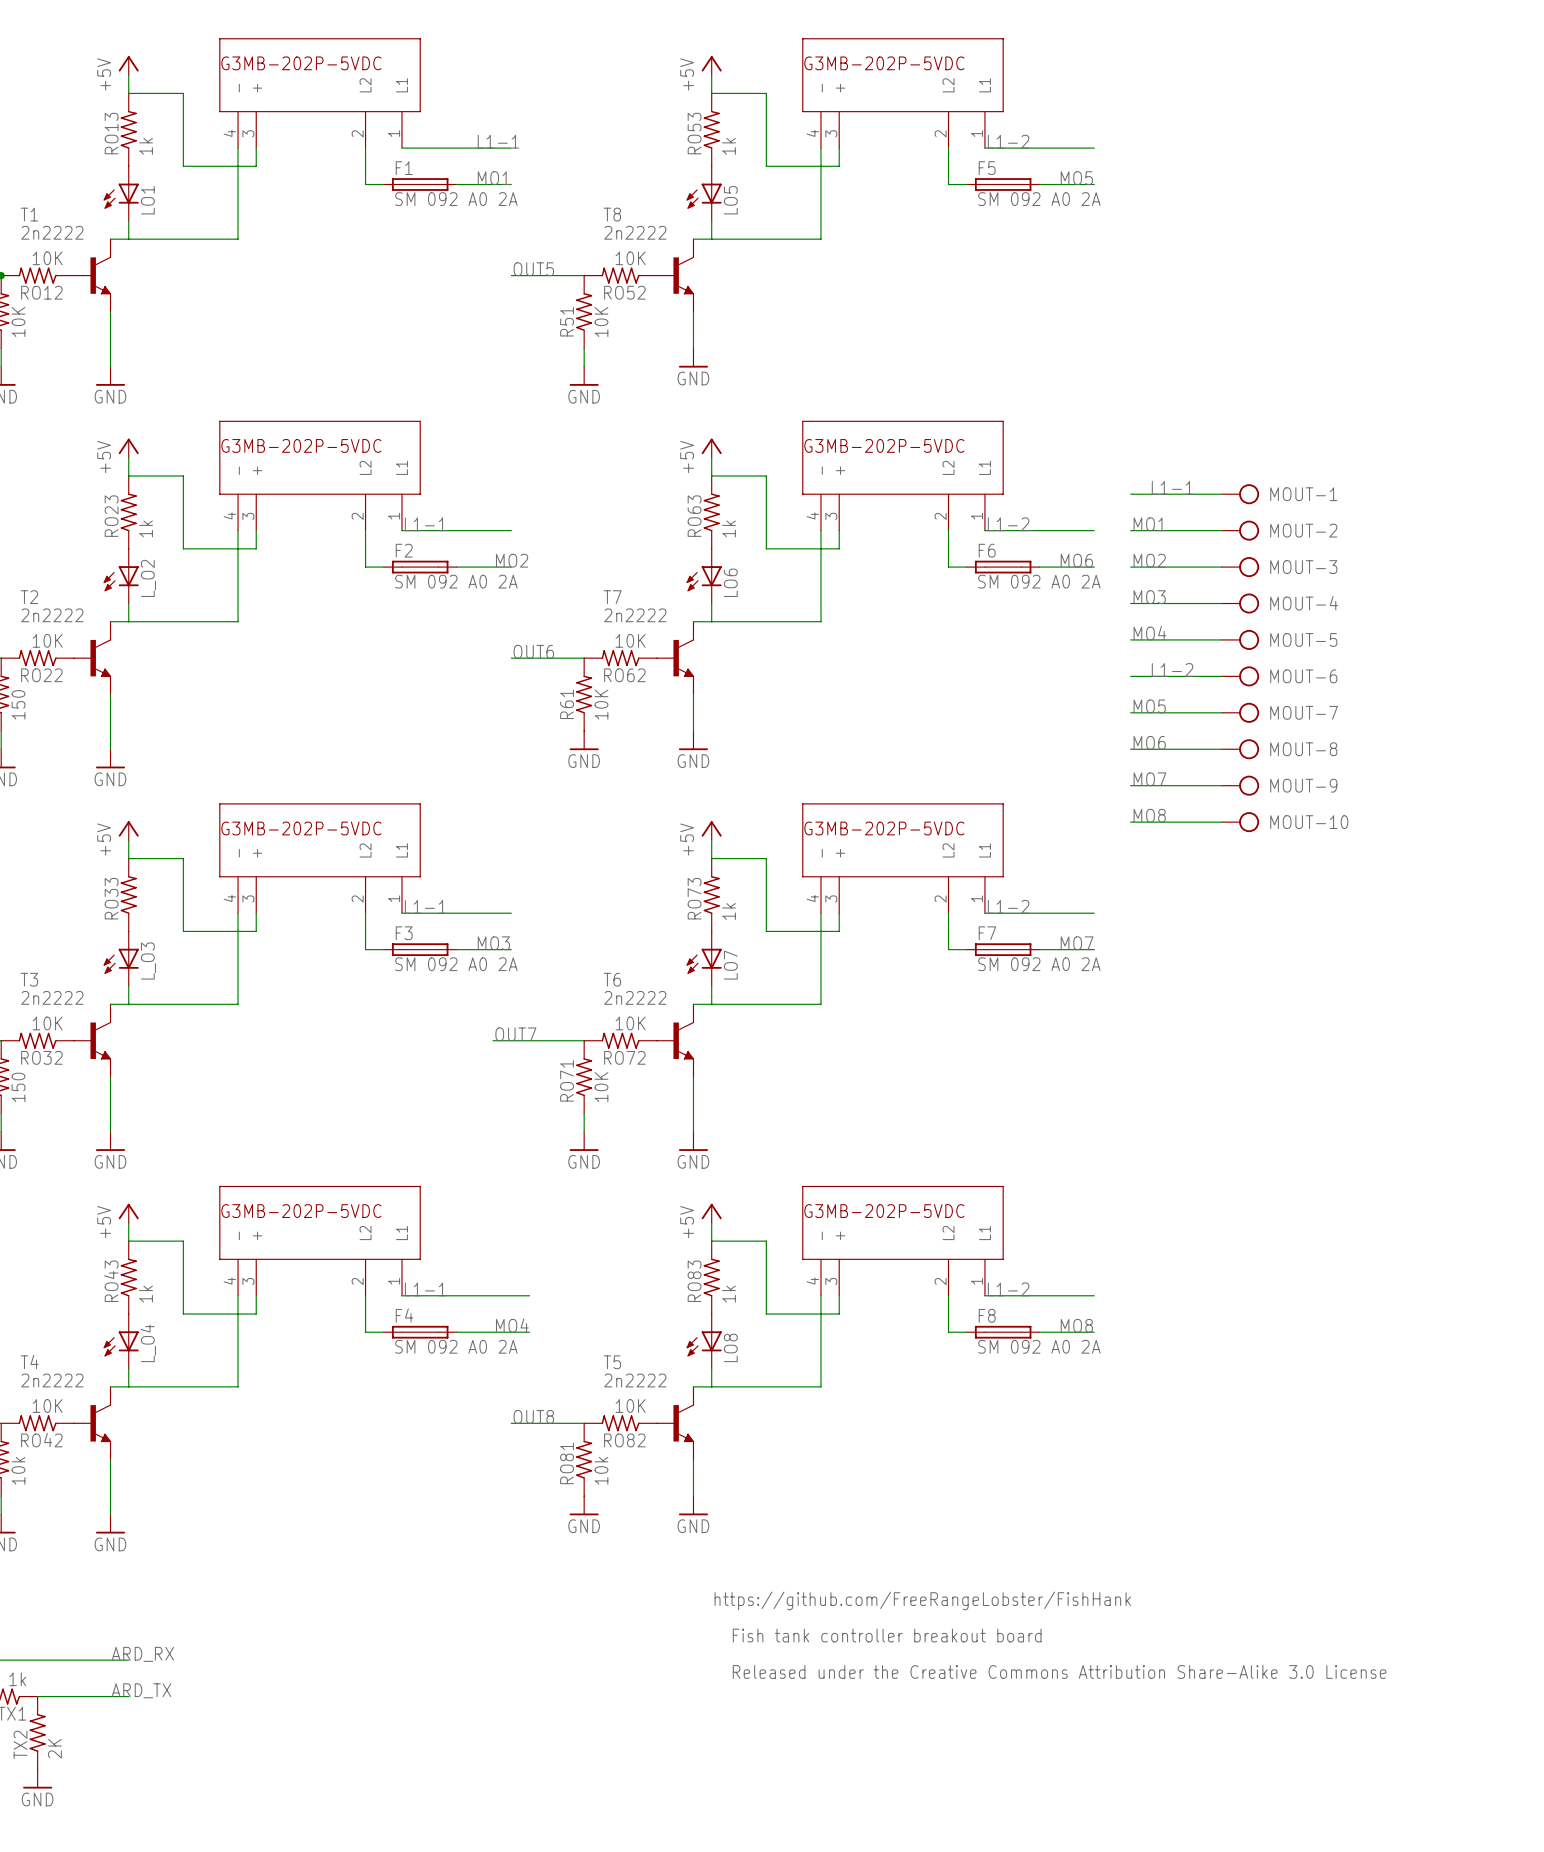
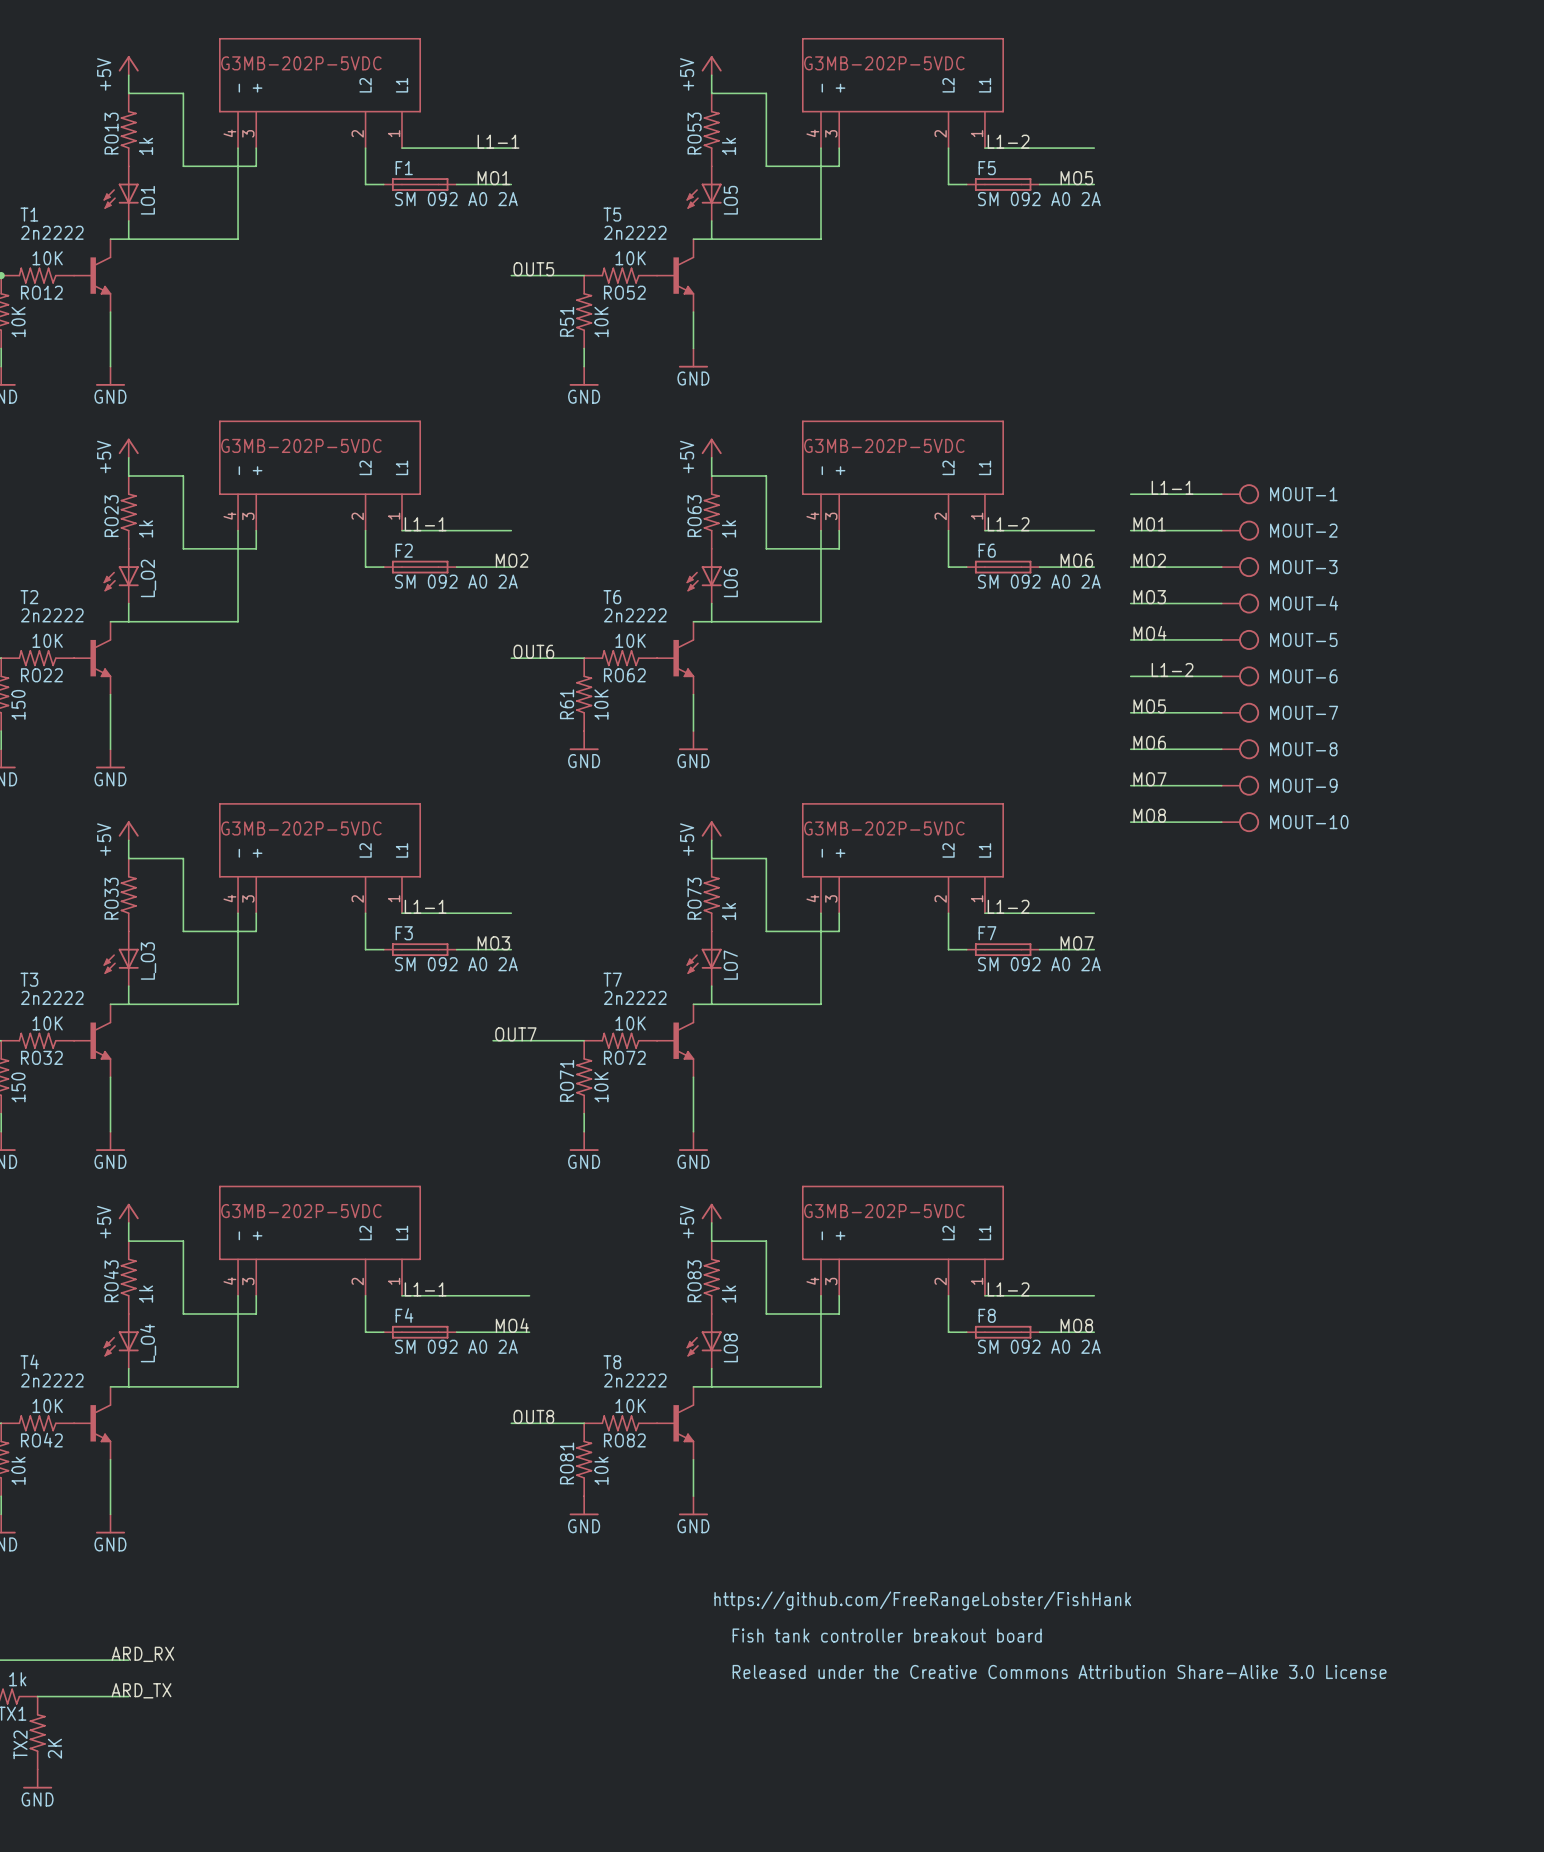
T8 name: T8 (612, 214) -> T5 (612, 214)
T7 name: T7 (612, 597) -> T6 (612, 597)
T6 name: T6 (612, 979) -> T7 (612, 979)
T5 name: T5 (612, 1362) -> T8 (612, 1362)

